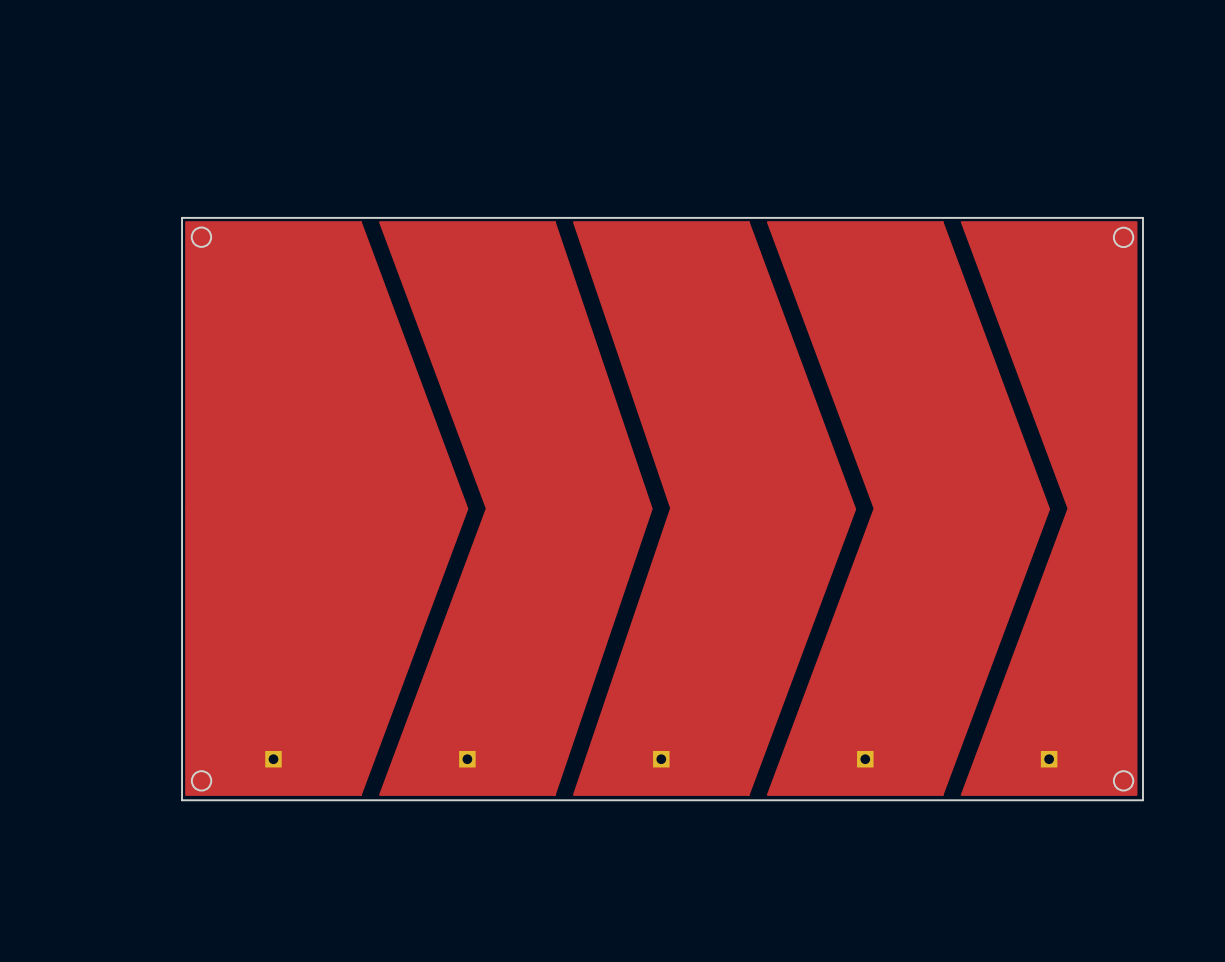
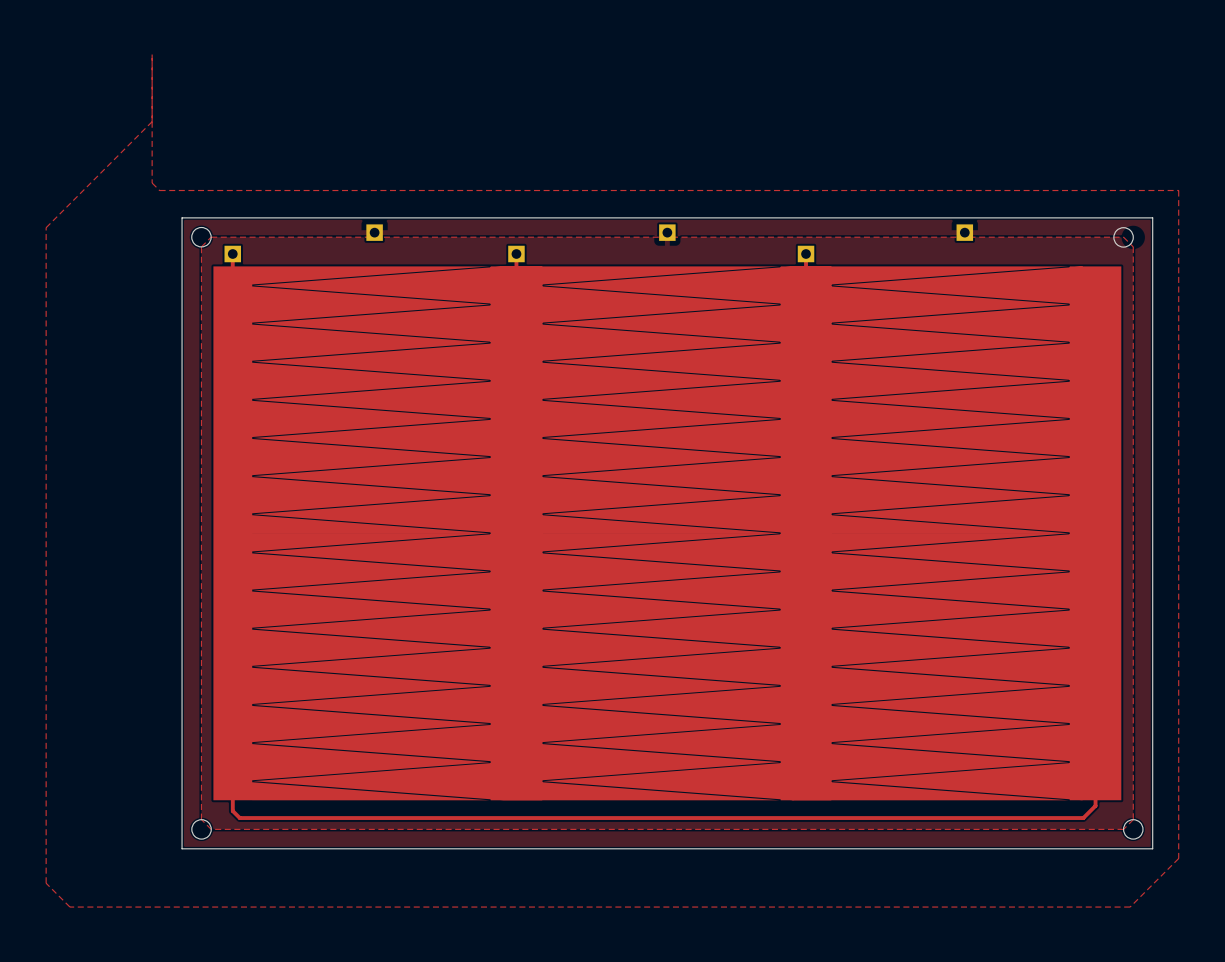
zone outline: none -> (152, 54) (152, 183) (159, 190) (1178, 190) (1178, 858) (1130, 907) (69, 907) (46, 883) (46, 227) (152, 121)
board edge: (1142, 217) (1142, 800) (182, 800) -> (1142, 217) (1152, 217) (1152, 848) (182, 848) (182, 800)
drawing: [185, 221, 1138, 796] -> none
part: none -> (374, 232)
part: none -> (667, 232)
part: none -> (964, 232)
zone outline: none -> (211, 237) (1123, 237) (1133, 246) (1133, 819) (1123, 829) (211, 829) (201, 819) (201, 246) (211, 237)
part: none -> (232, 253)
part: none -> (516, 253)
part: none -> (806, 253)
track: none -> (232, 533) (232, 811) (239, 818) (1083, 818) (1095, 805) (1095, 533)
part: none -> (667, 533)
part: (273, 759) -> none
part: (467, 759) -> none
part: (661, 759) -> none
part: (865, 759) -> none
part: (1049, 759) -> none
round board edge position: (201, 780) -> (201, 829)
round board edge position: (1123, 780) -> (1133, 829)

